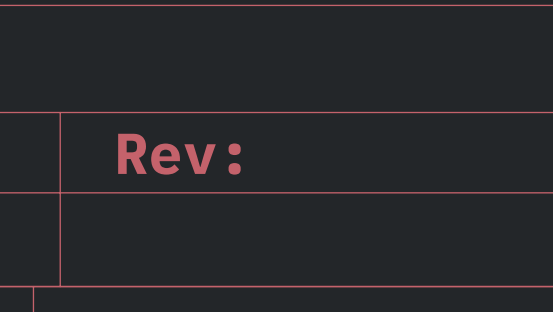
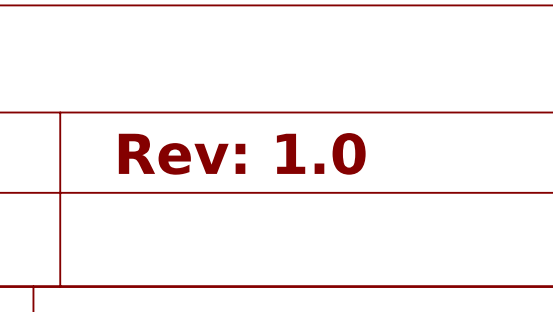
title block: Rev: (179, 154) -> Rev: 1.0 (242, 153)

